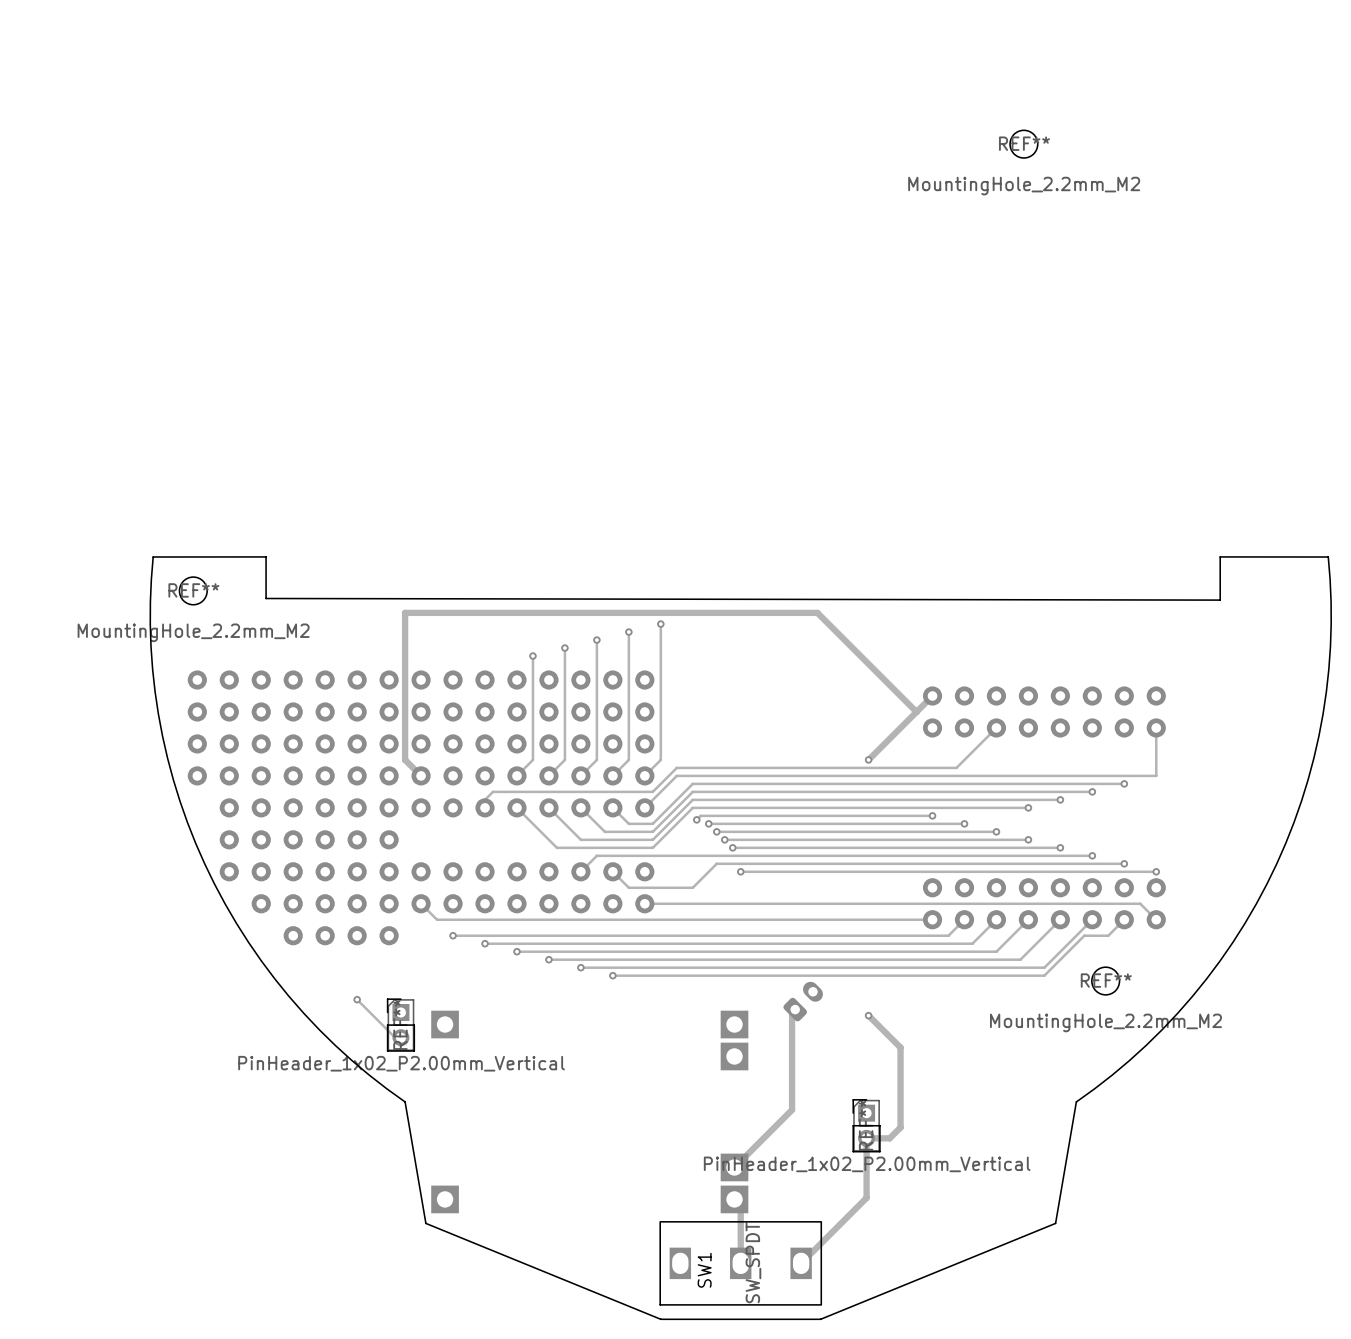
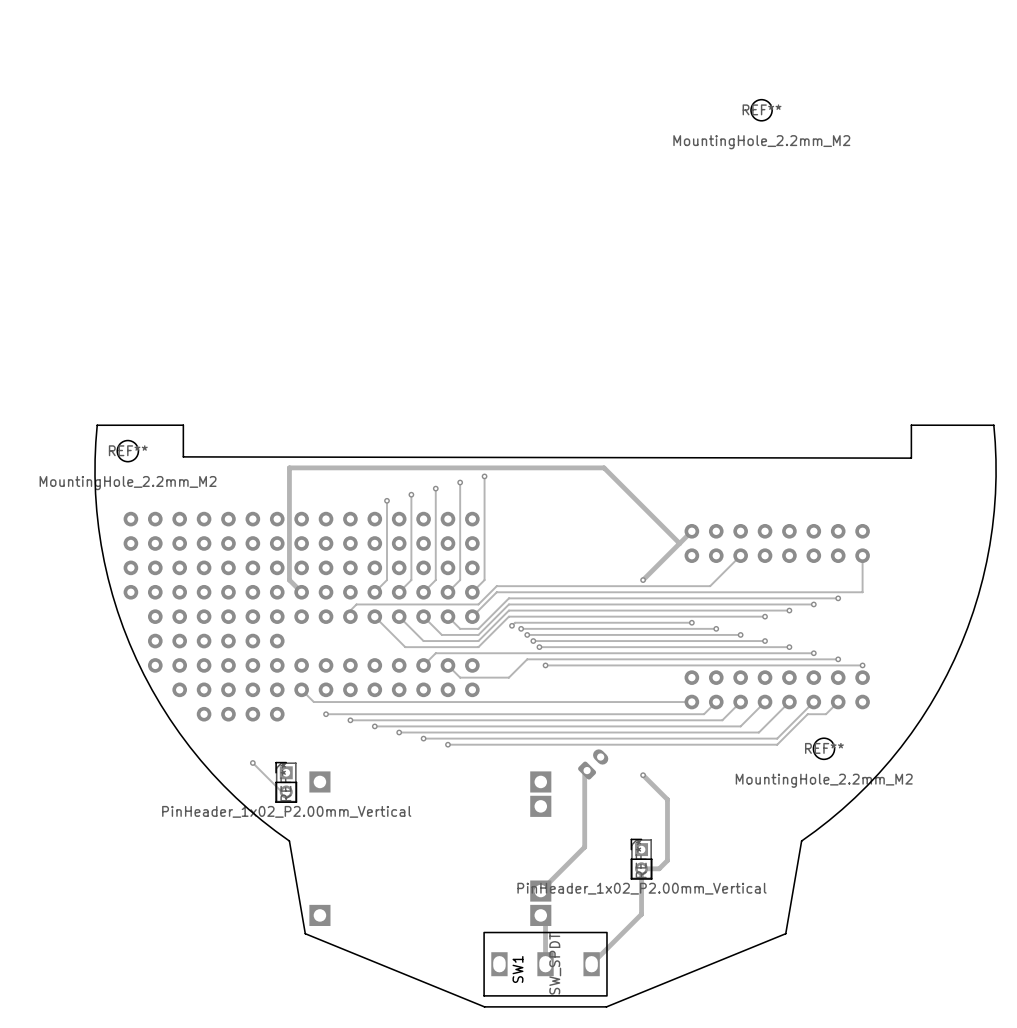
track: (644, 903) (1140, 903) (1156, 919) -> none

